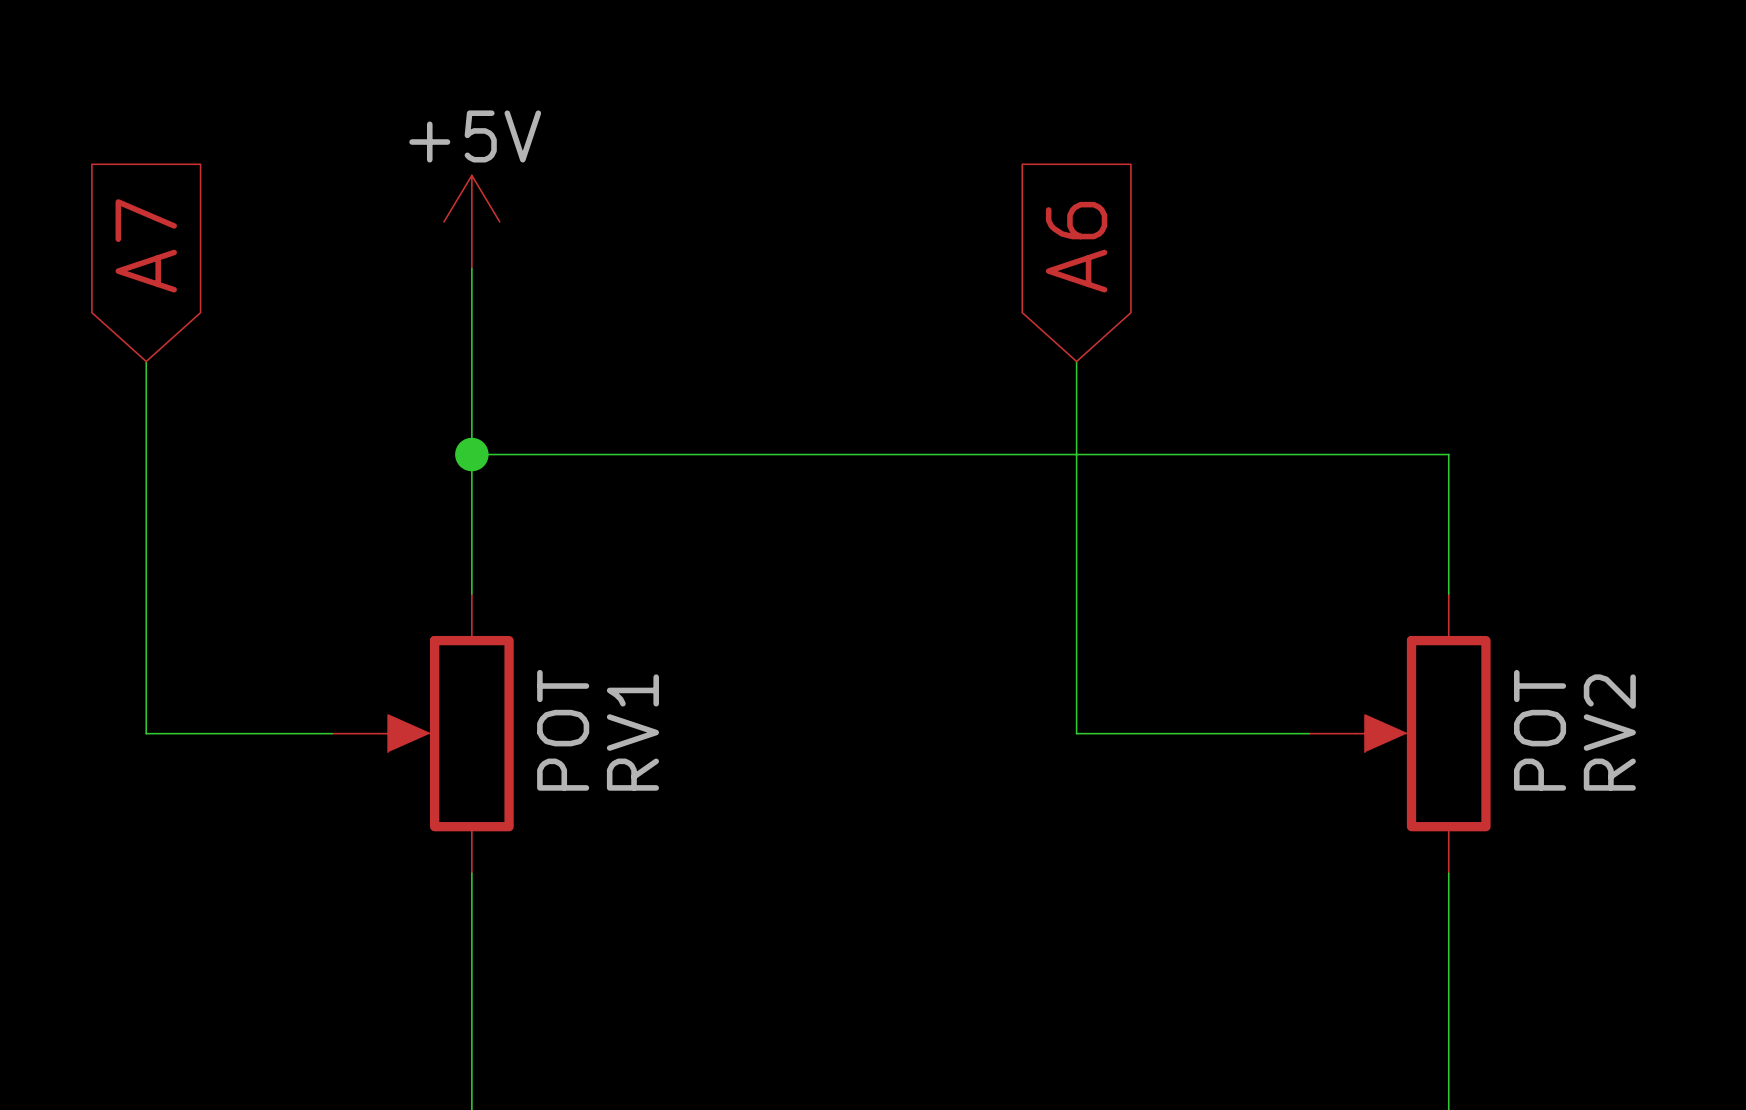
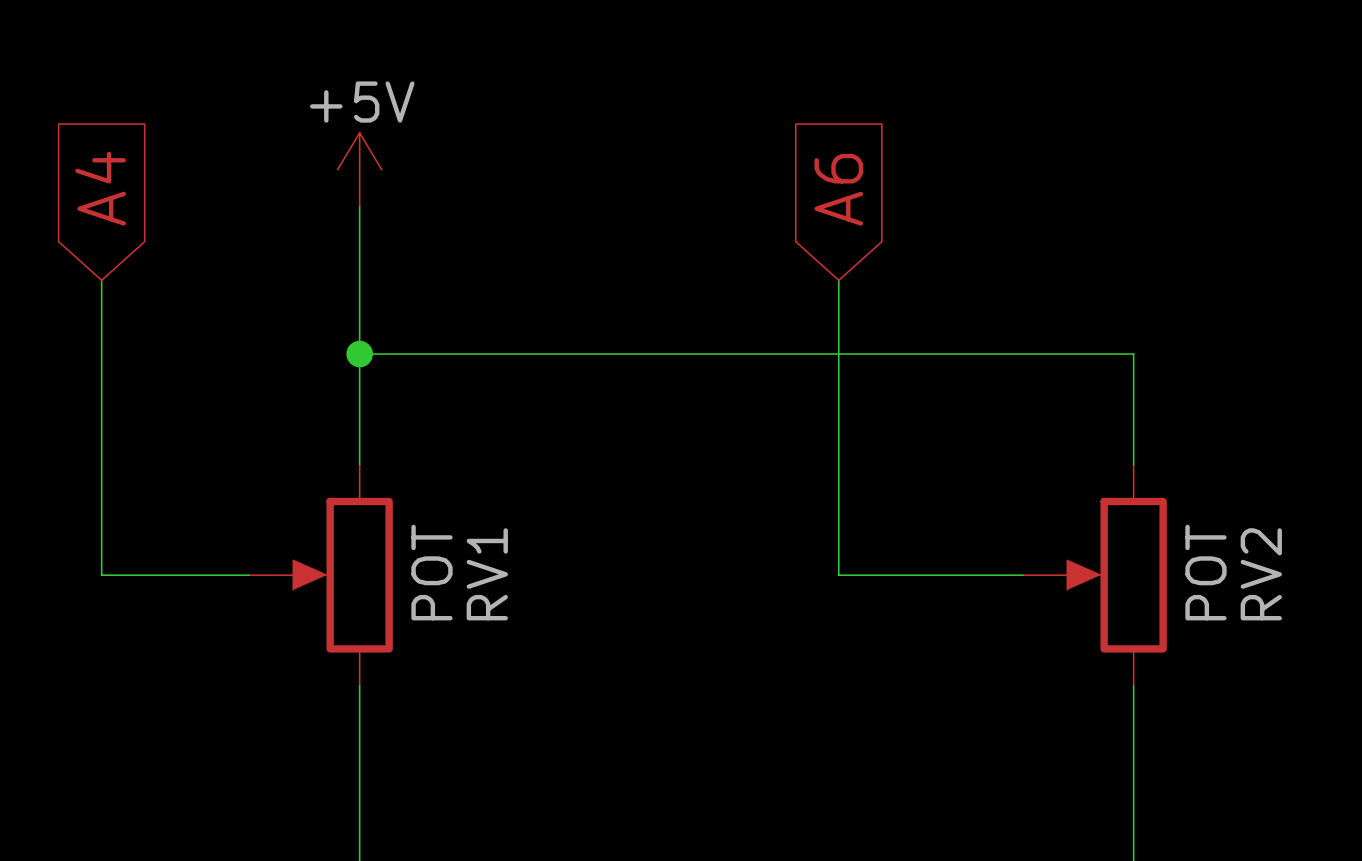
global label: A7 (146, 245) -> A4 (100, 188)

